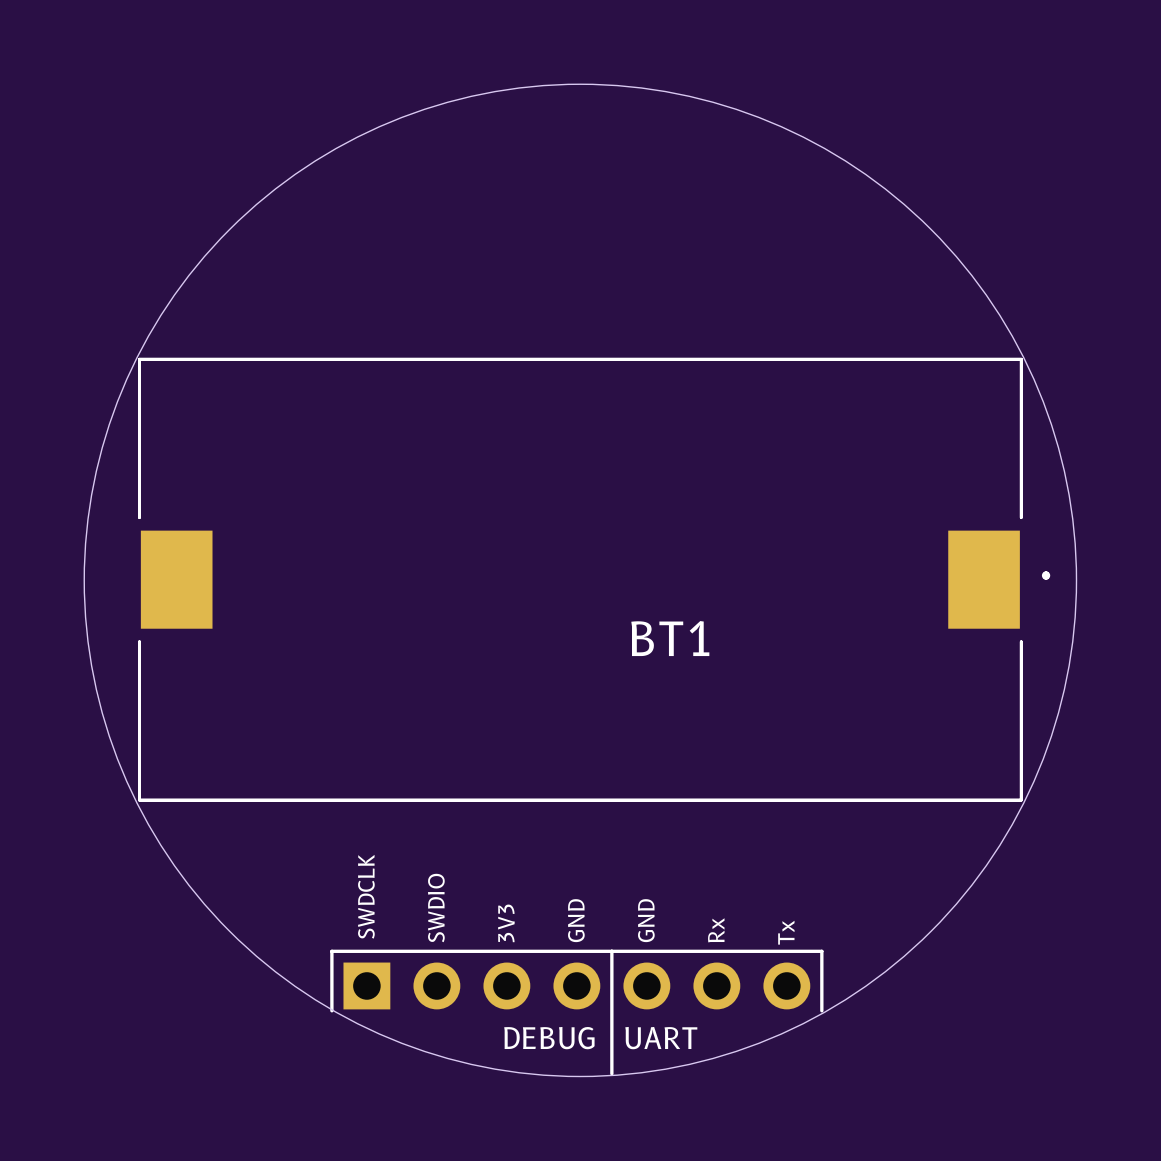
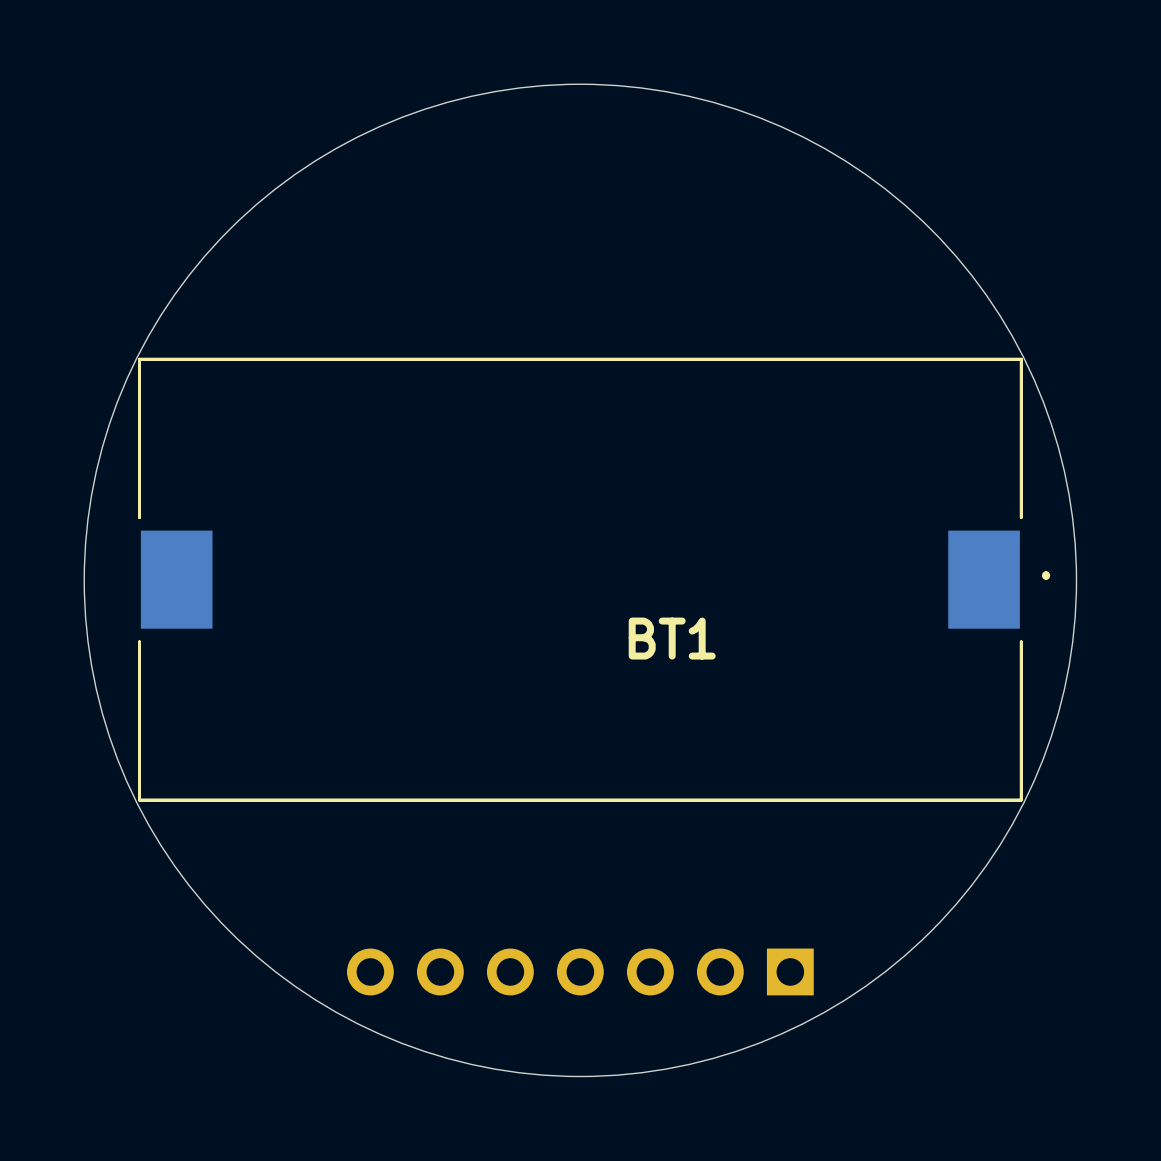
text: SWDCLK (366, 896) -> none
text: SWDIO (436, 908) -> none
text: GND (576, 920) -> none
text: GND (646, 920) -> none
text: 3V3 (506, 923) -> none
text: Rx (716, 930) -> none
text: Tx (786, 932) -> none
line: (611, 951) (611, 1073) -> none
part side: bottom (576, 985) -> top (580, 971)
line: (821, 1010) (821, 951) (331, 951) (331, 1010) -> none
text: DEBUG (549, 1038) -> none
text: UART (661, 1038) -> none

